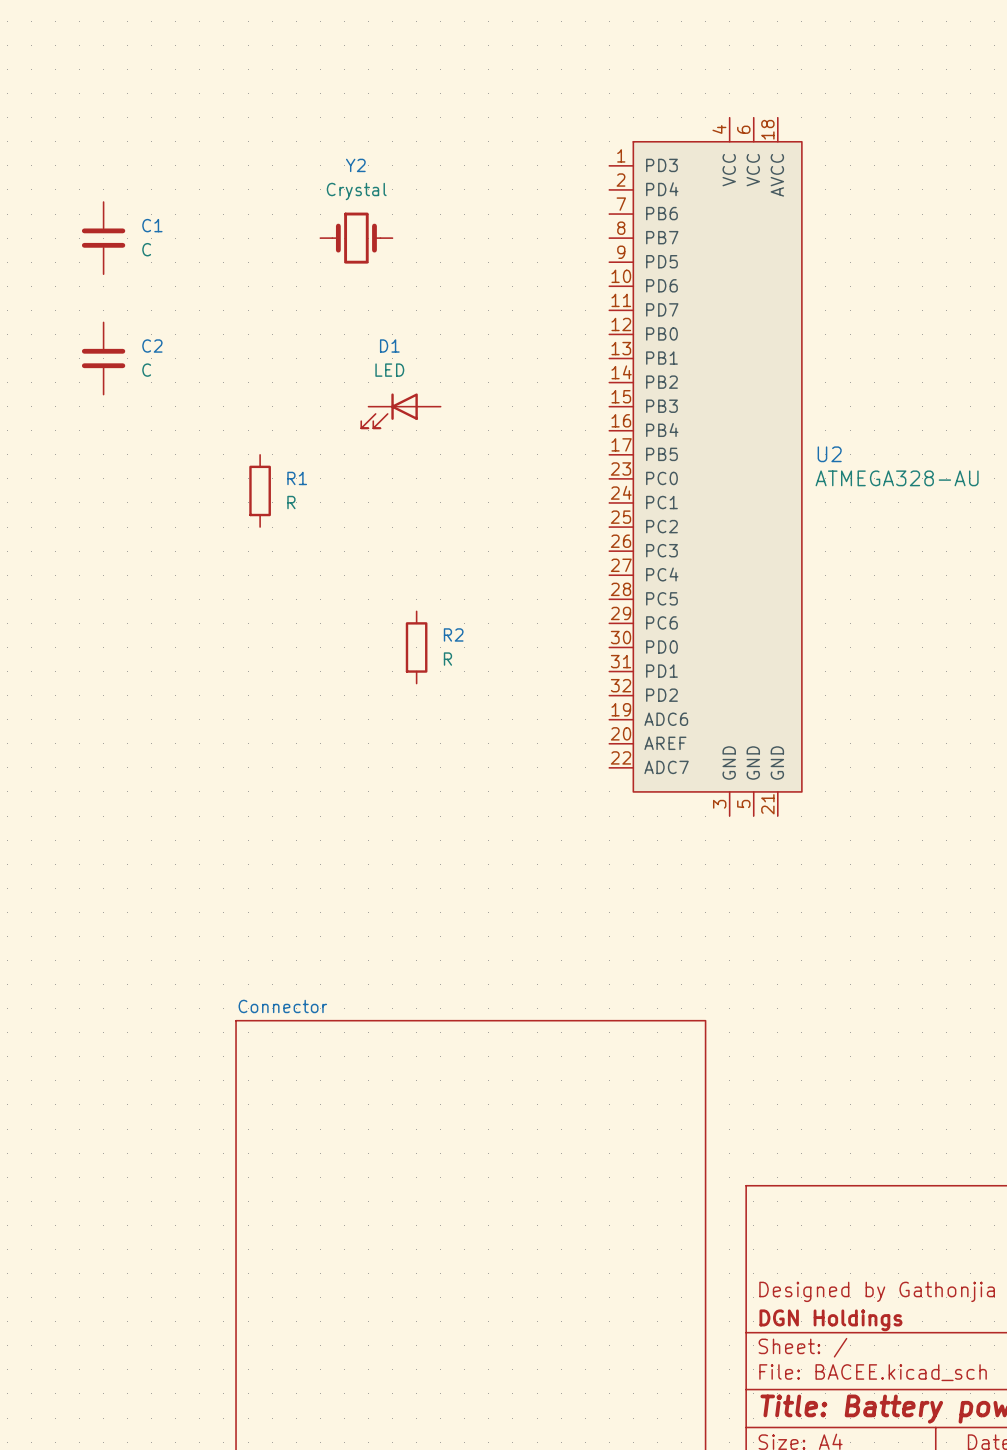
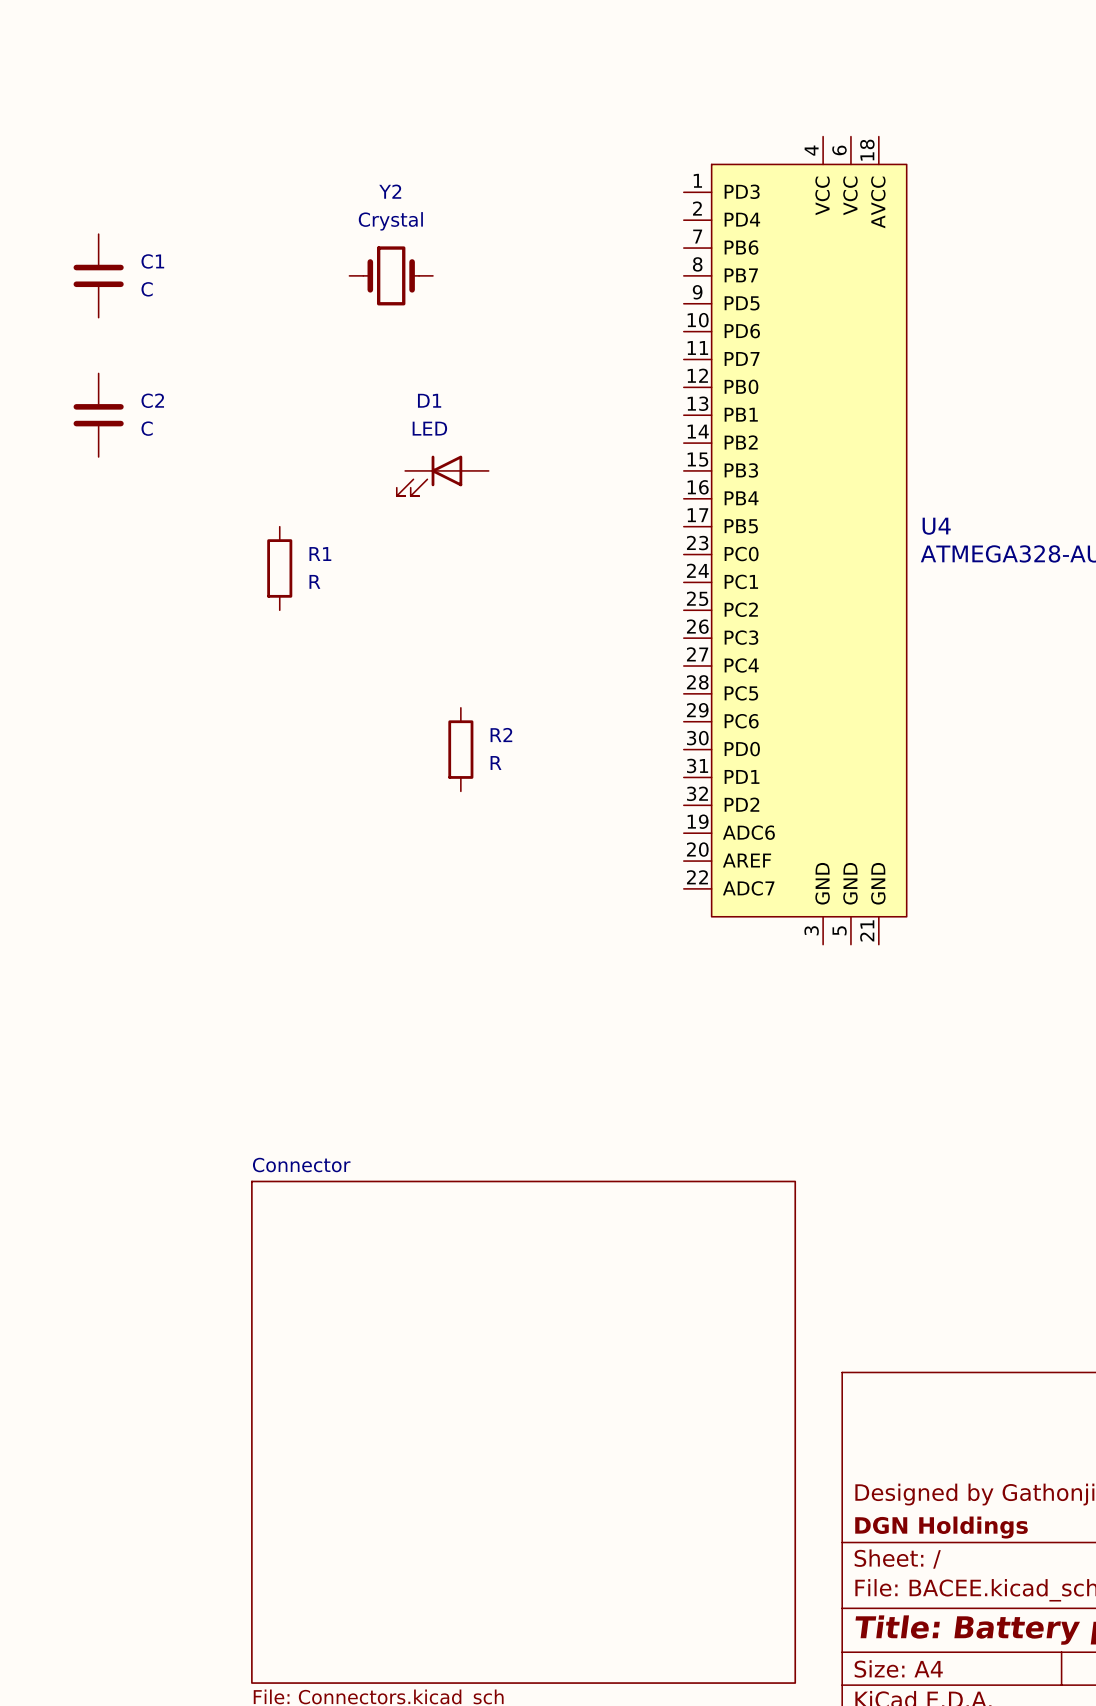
U2 name: U2 (829, 454) -> U4 (936, 526)

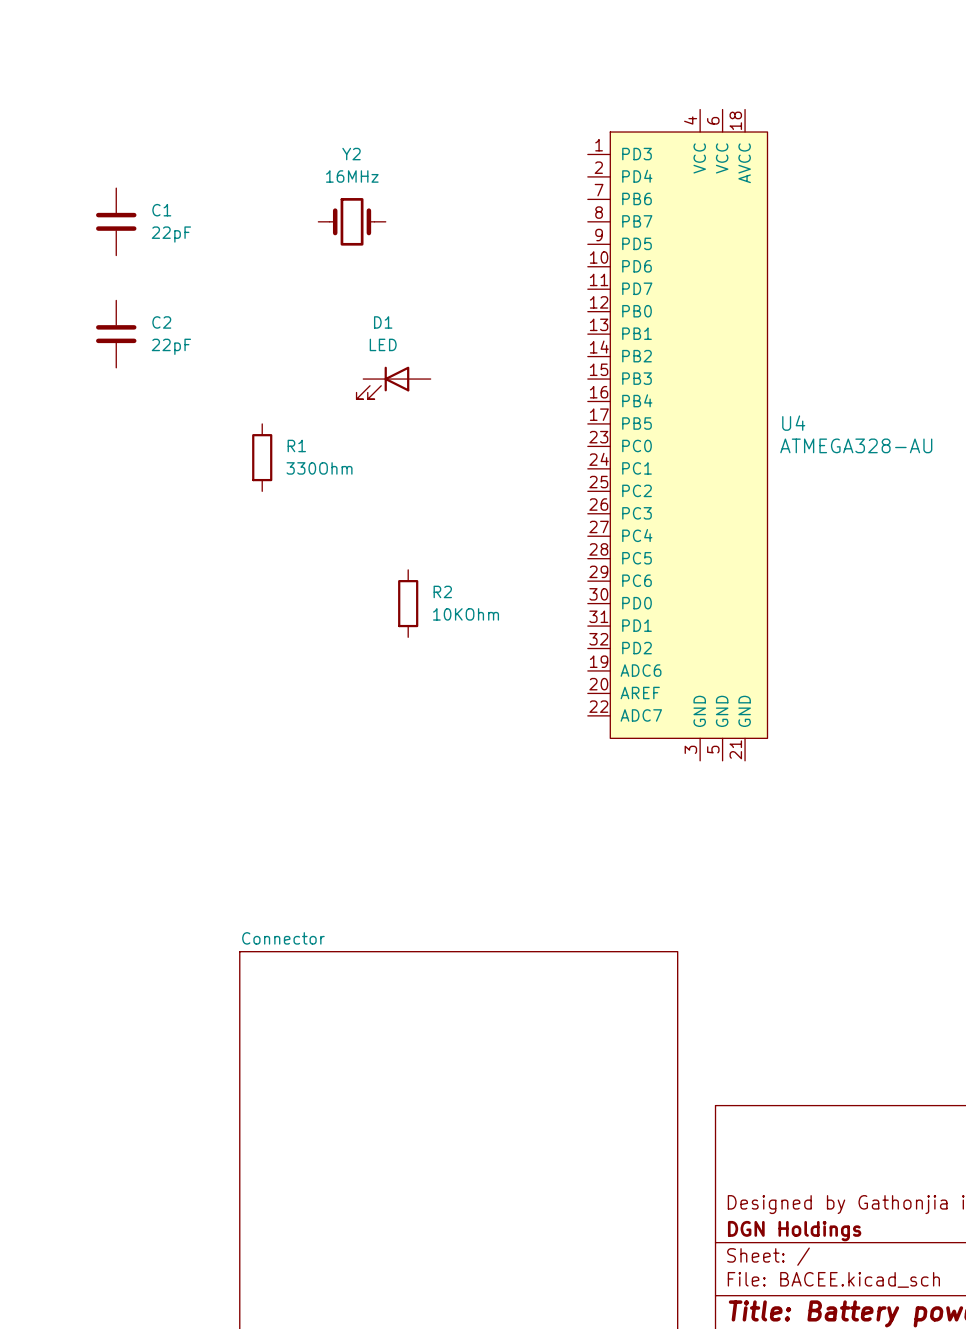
Y2 value: Crystal (390, 221) -> 16MHz (352, 176)
C1 value: C (147, 289) -> 22pF (171, 234)
C2 value: C (147, 428) -> 22pF (171, 346)
R1 value: R (314, 581) -> 330Ohm (319, 468)
R2 value: R (496, 763) -> 10KOhm (466, 614)

